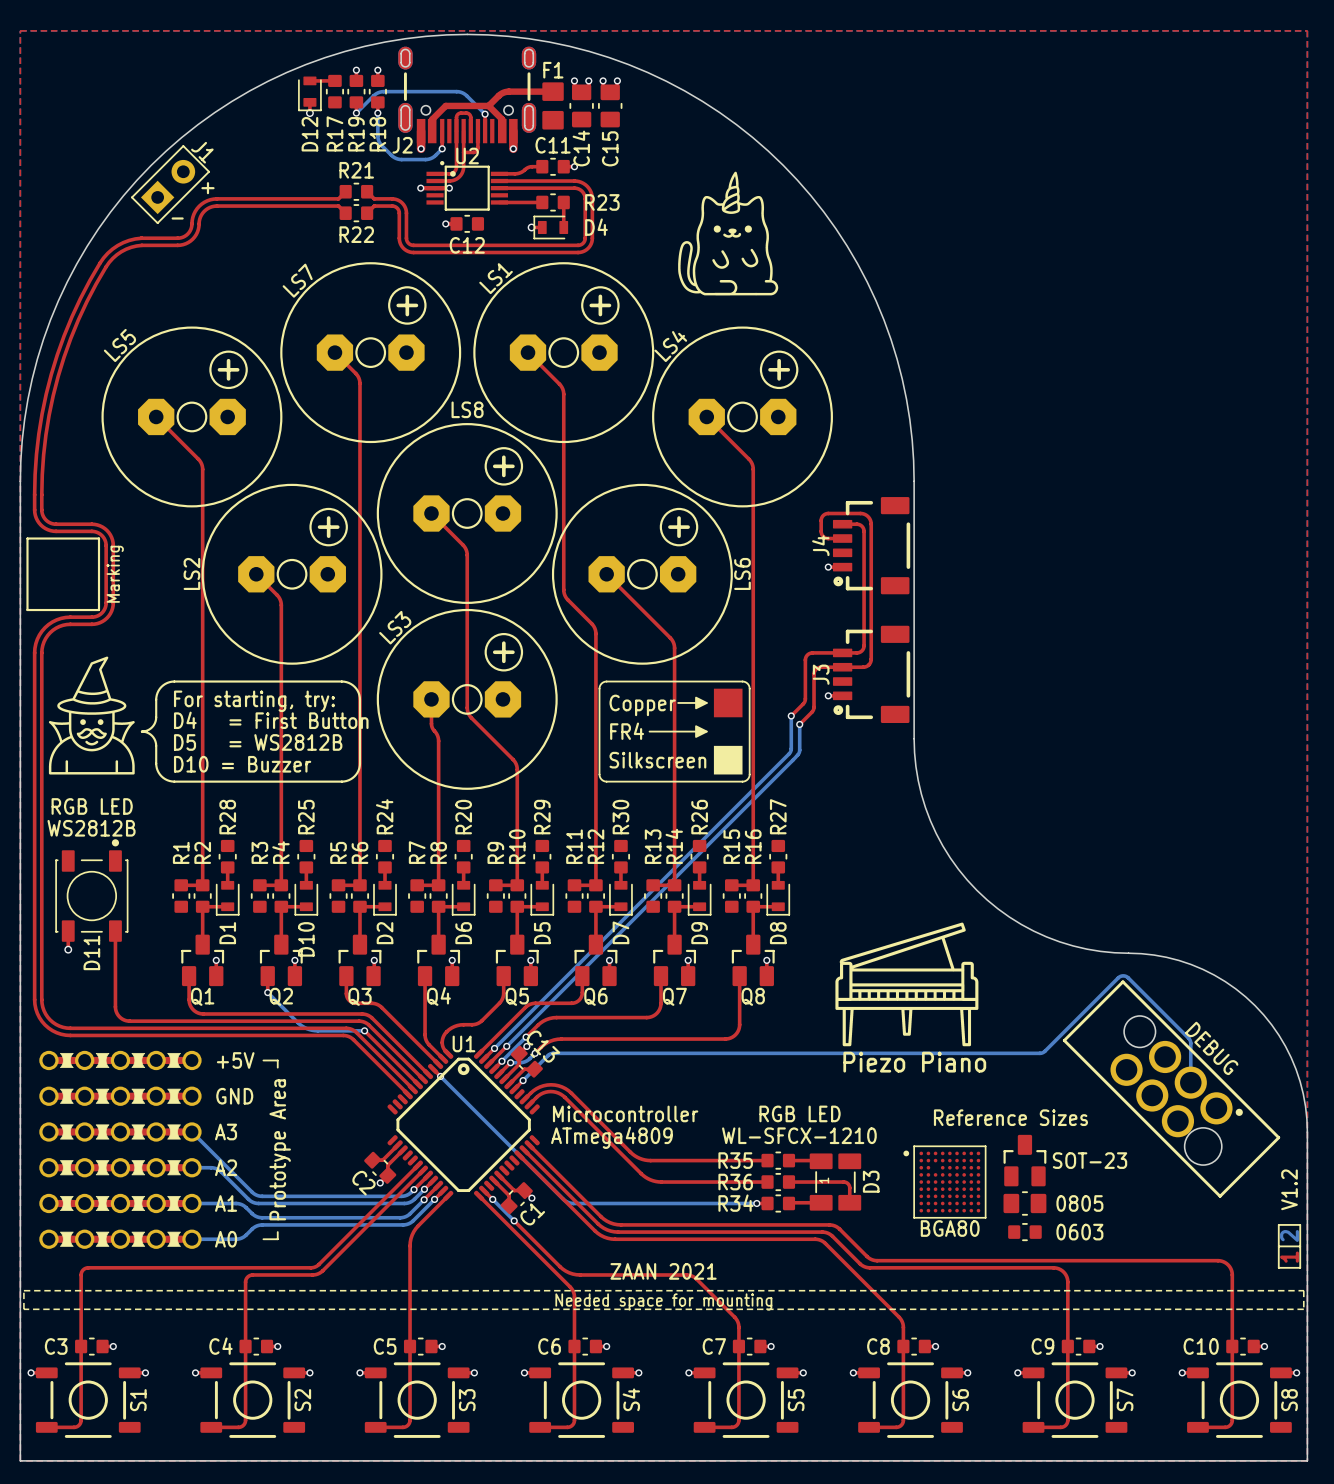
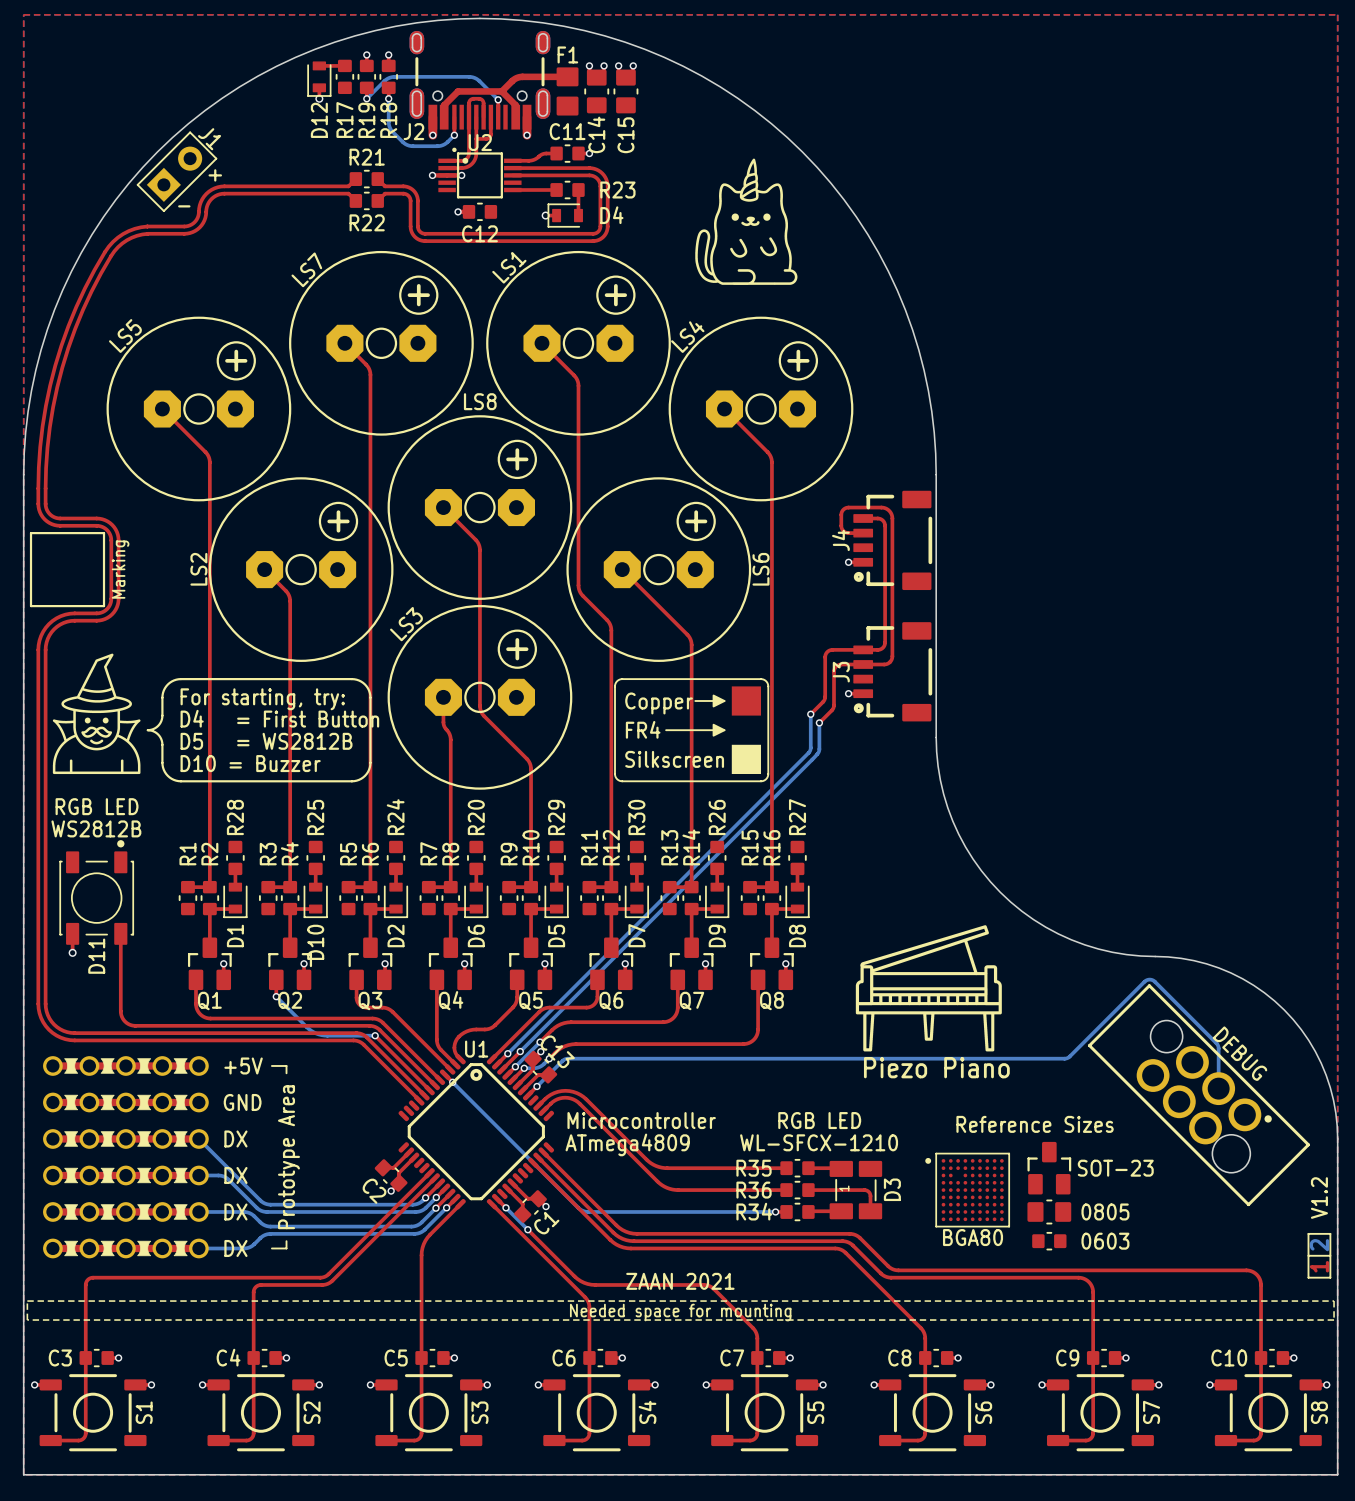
text: A3 (226, 1131) -> DX (235, 1138)
text: A2 (226, 1167) -> DX (235, 1175)
text: A1 (226, 1203) -> DX (235, 1211)
text: A0 (226, 1239) -> DX (235, 1248)

